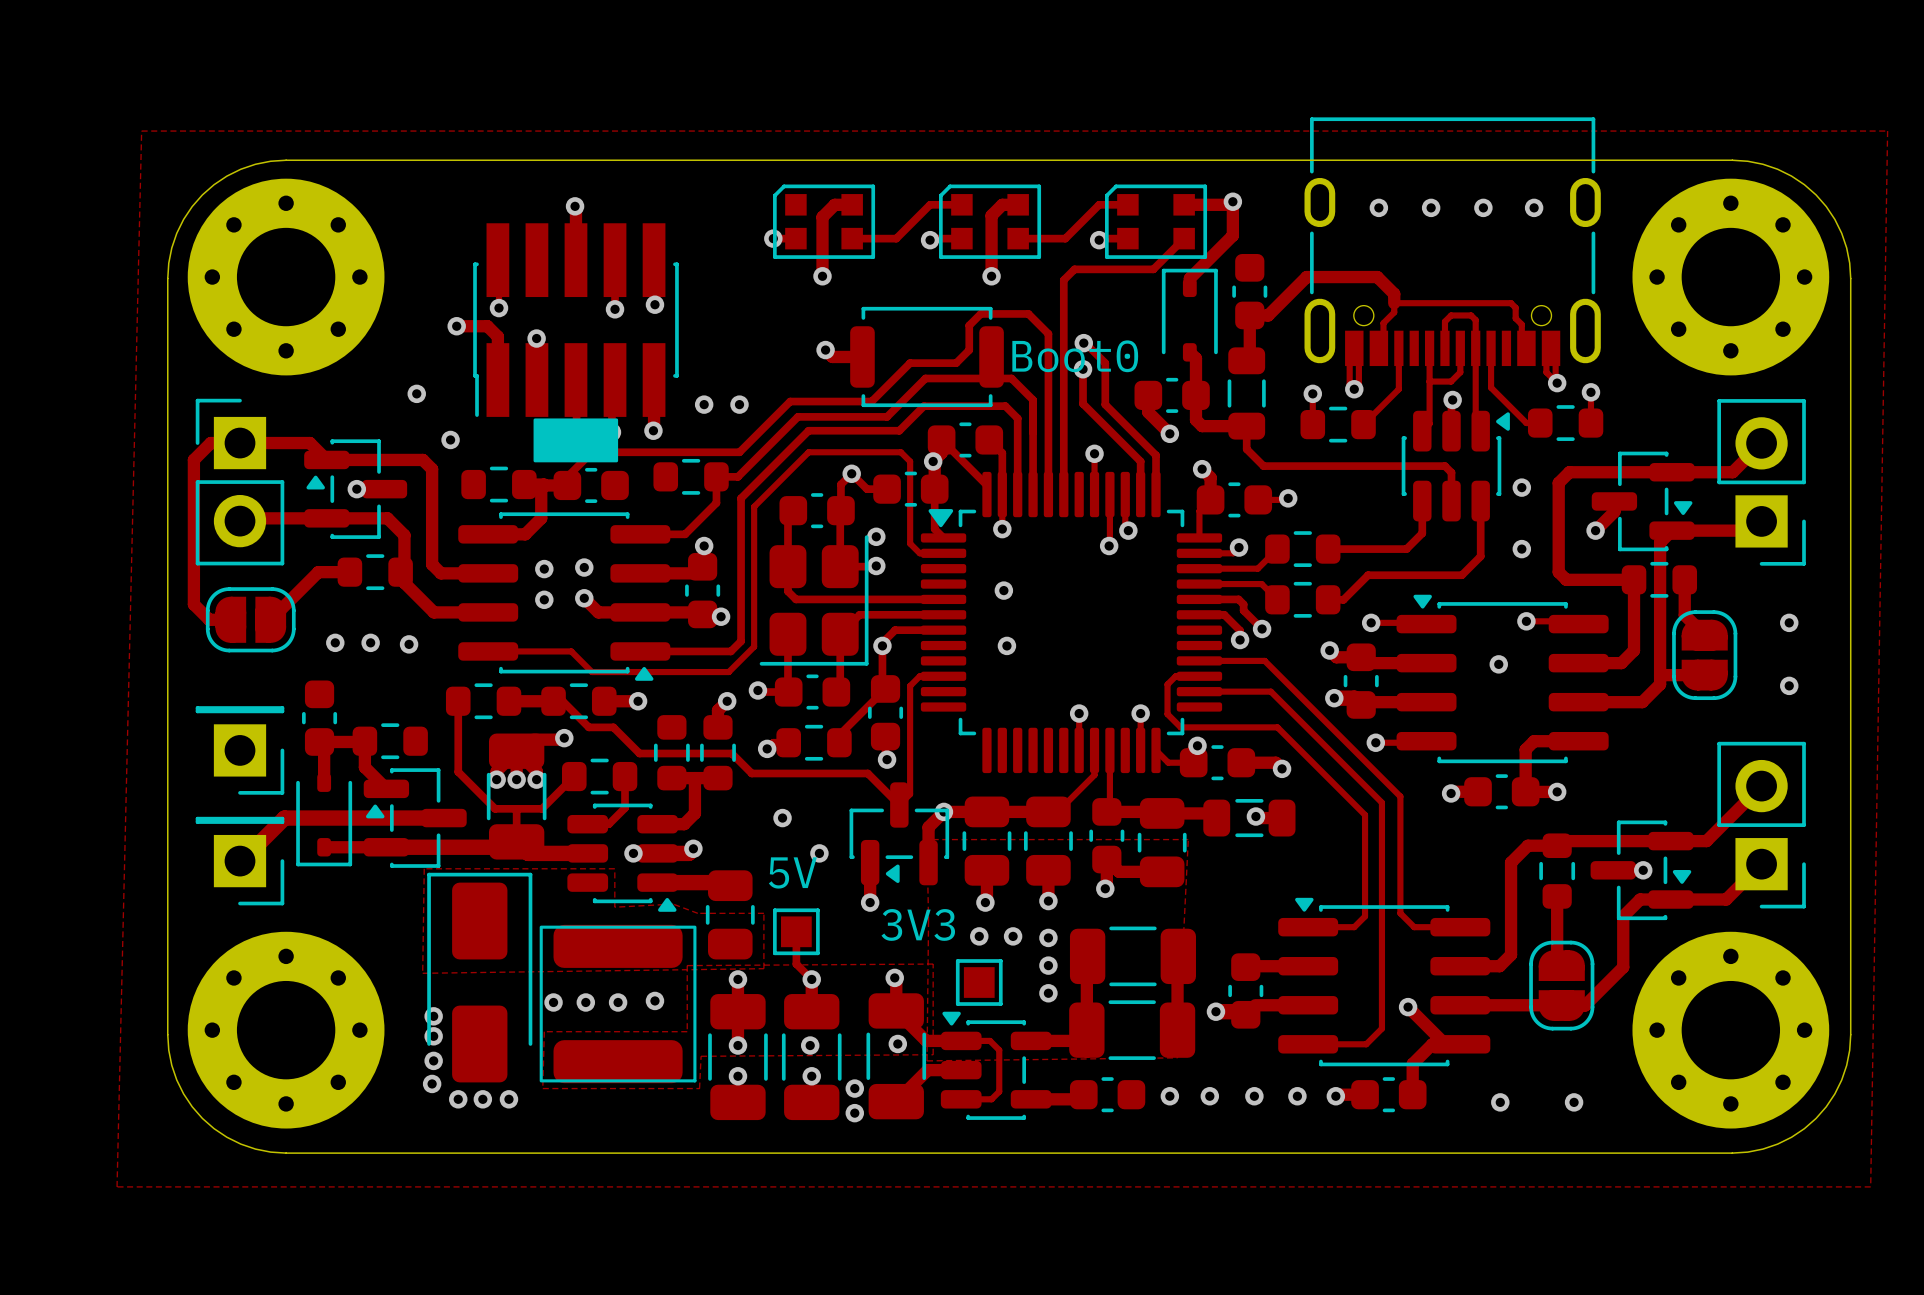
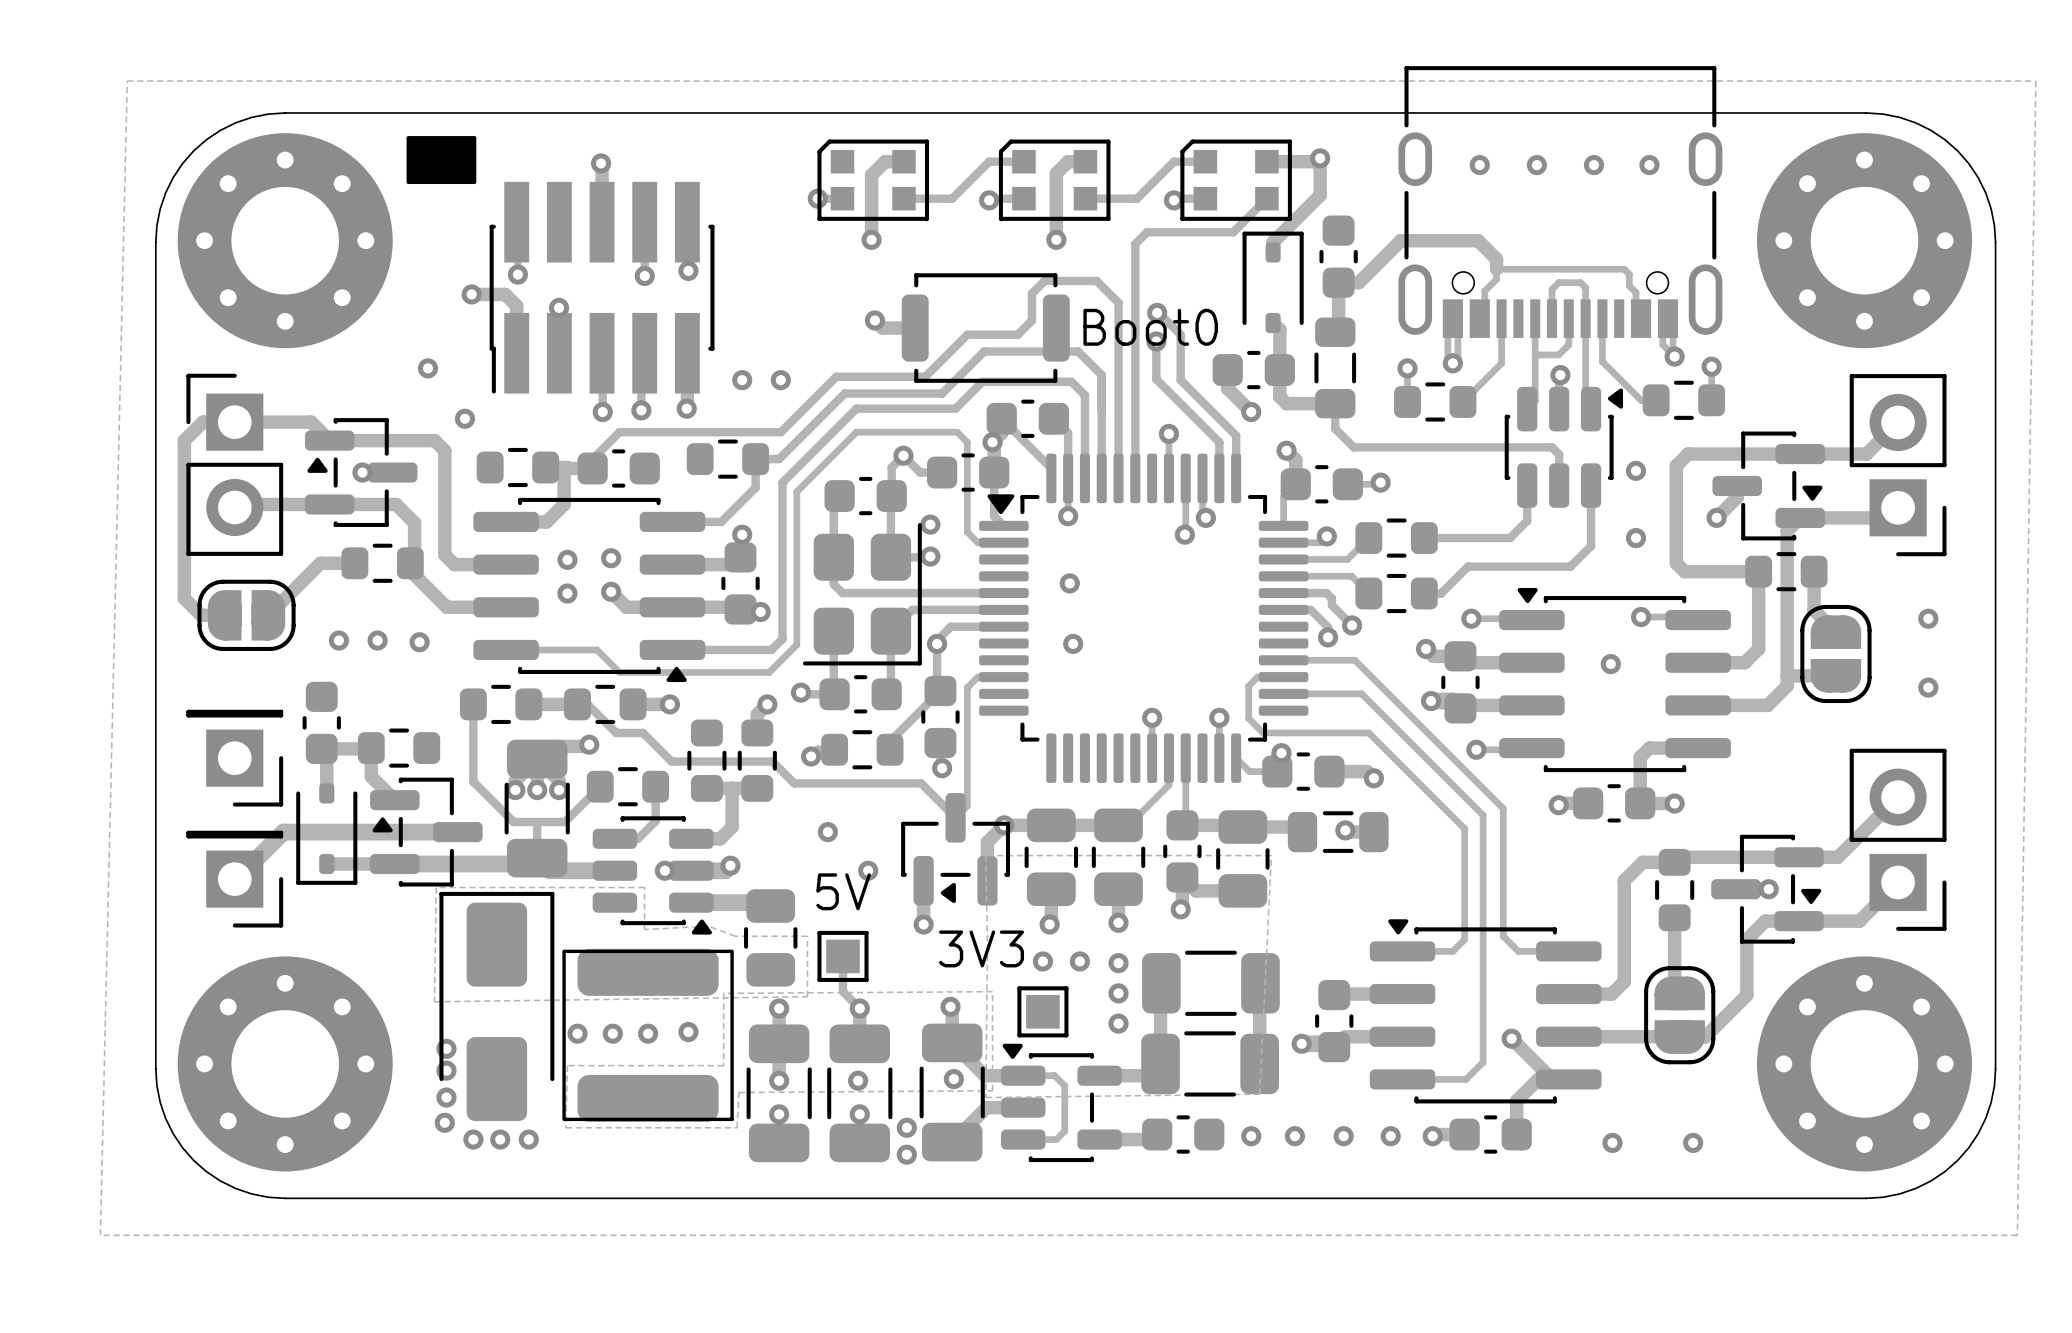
drawing: none -> [406, 136, 477, 185]
drawing: [533, 418, 619, 463] -> none

